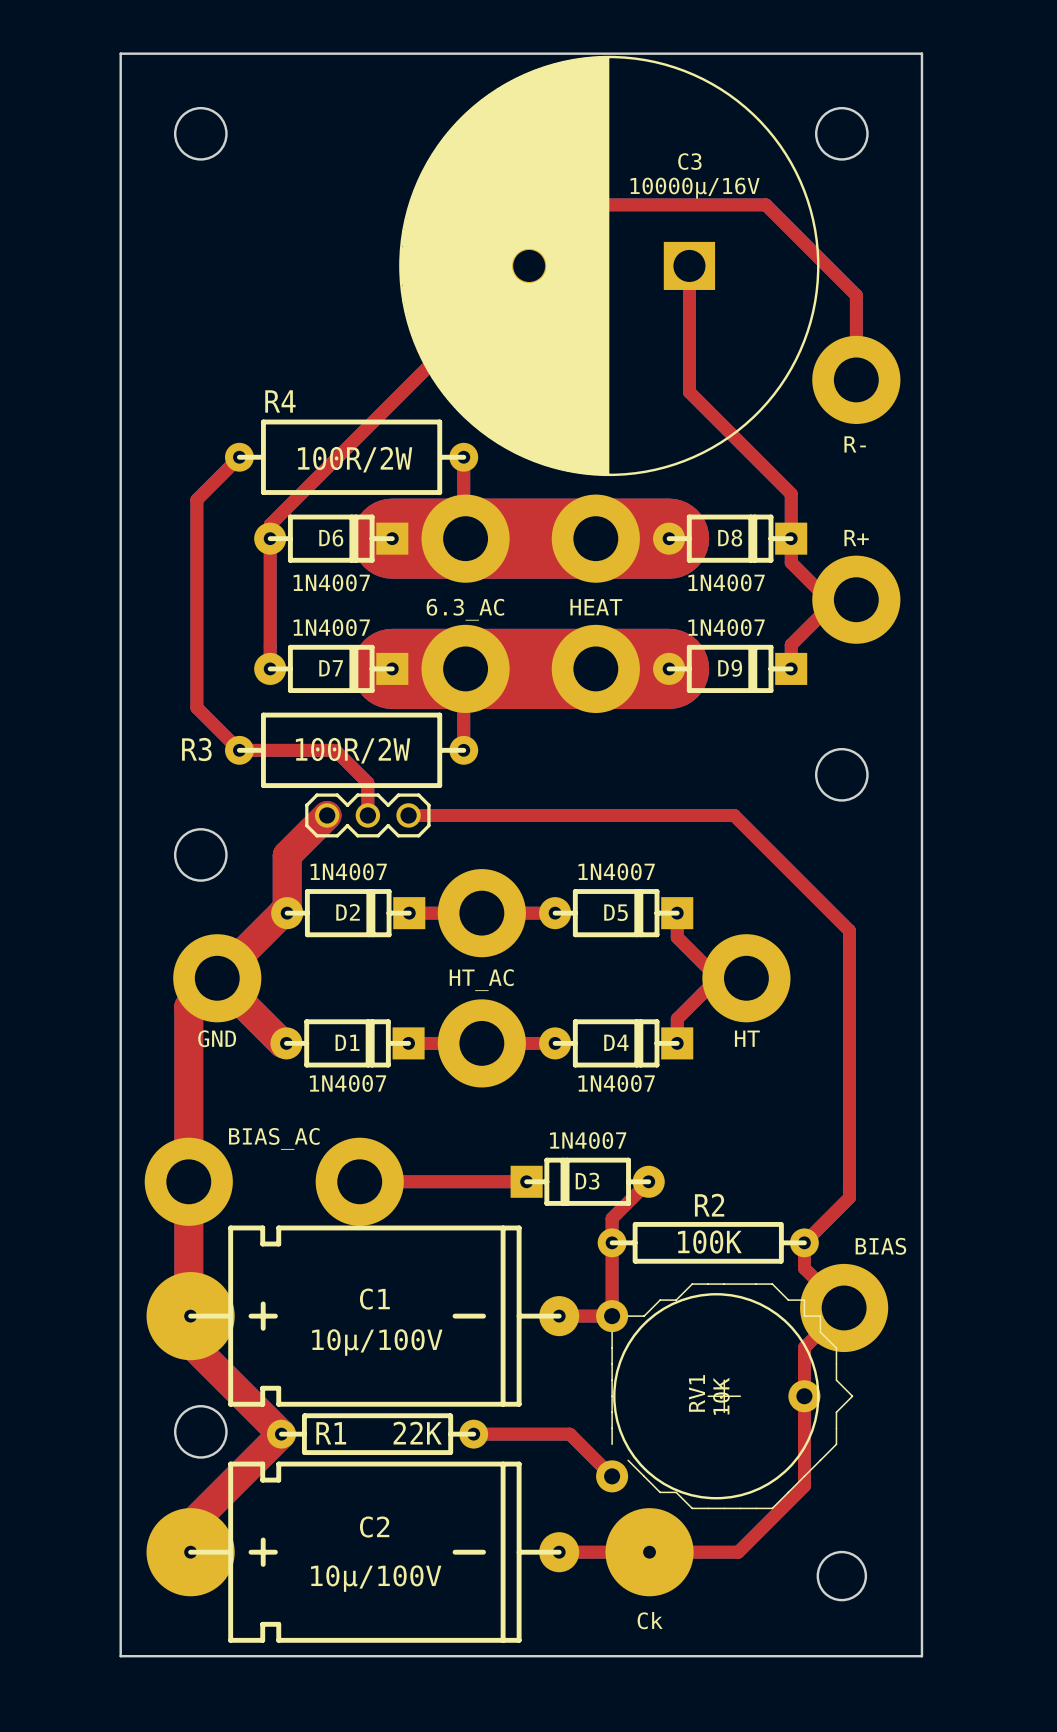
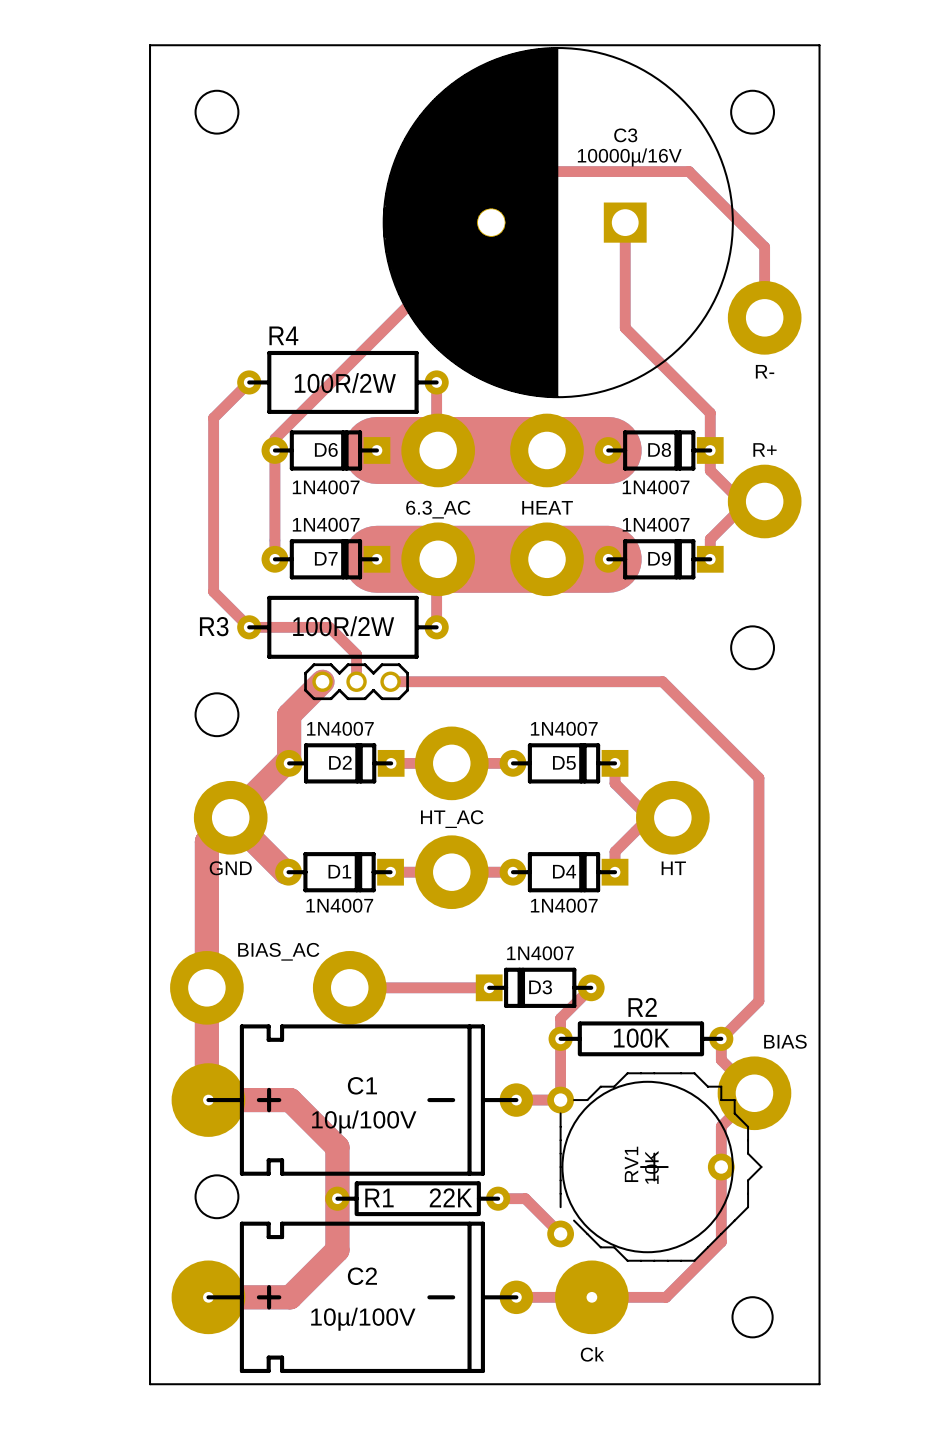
top track: (190, 1316) (190, 1343) (281, 1434) (190, 1524) (190, 1552) -> (208, 1100) (290, 1100) (337, 1147) (337, 1250) (290, 1297) (208, 1297)
R1 position: (377, 1434) -> (417, 1198)
top track: (473, 1434) (537, 1434) -> none

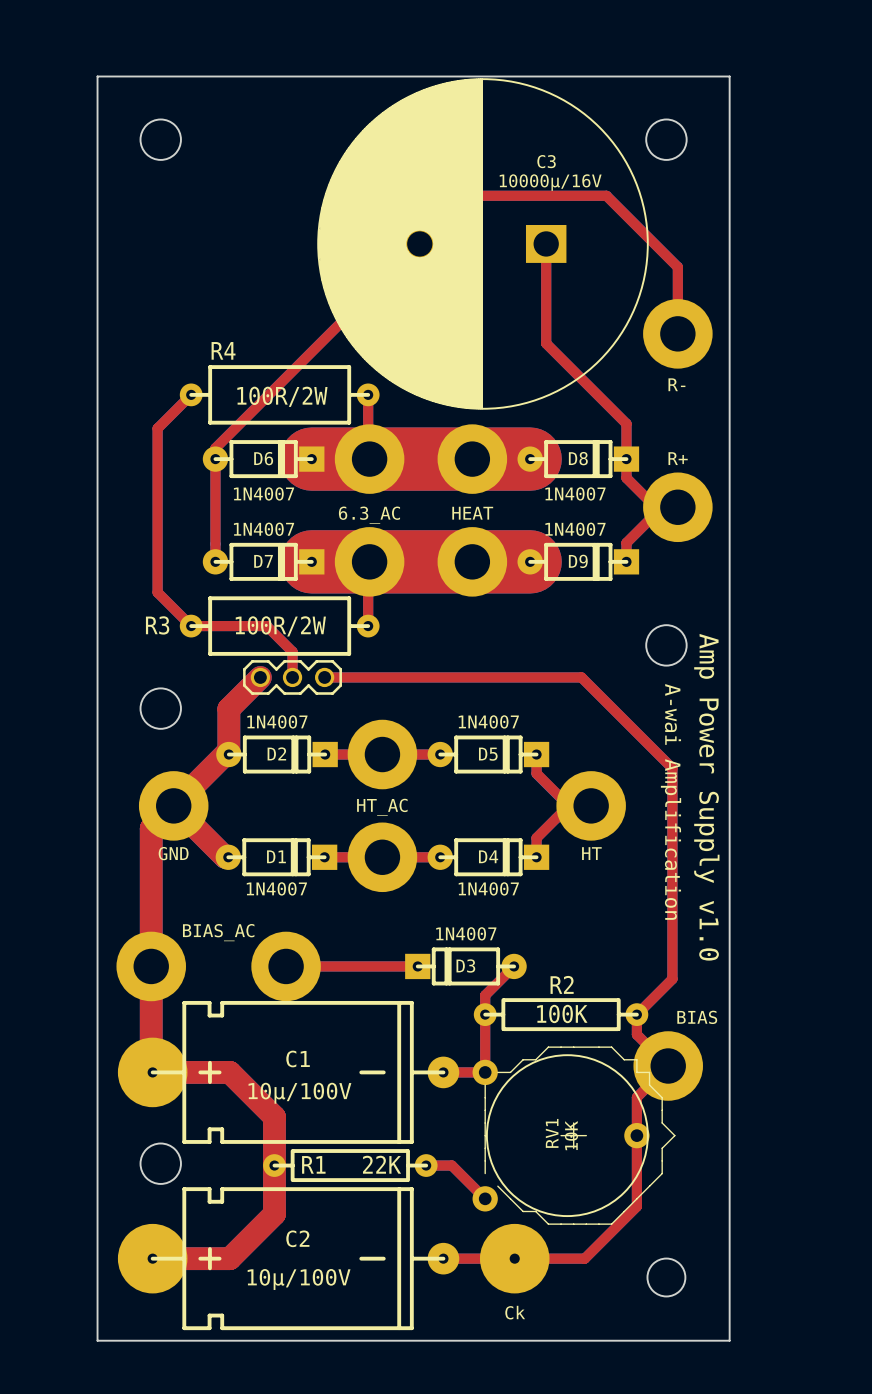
text: none -> Amp Power Supply v1.0 (706, 797)
text: none -> A-wai Amplification (671, 801)

